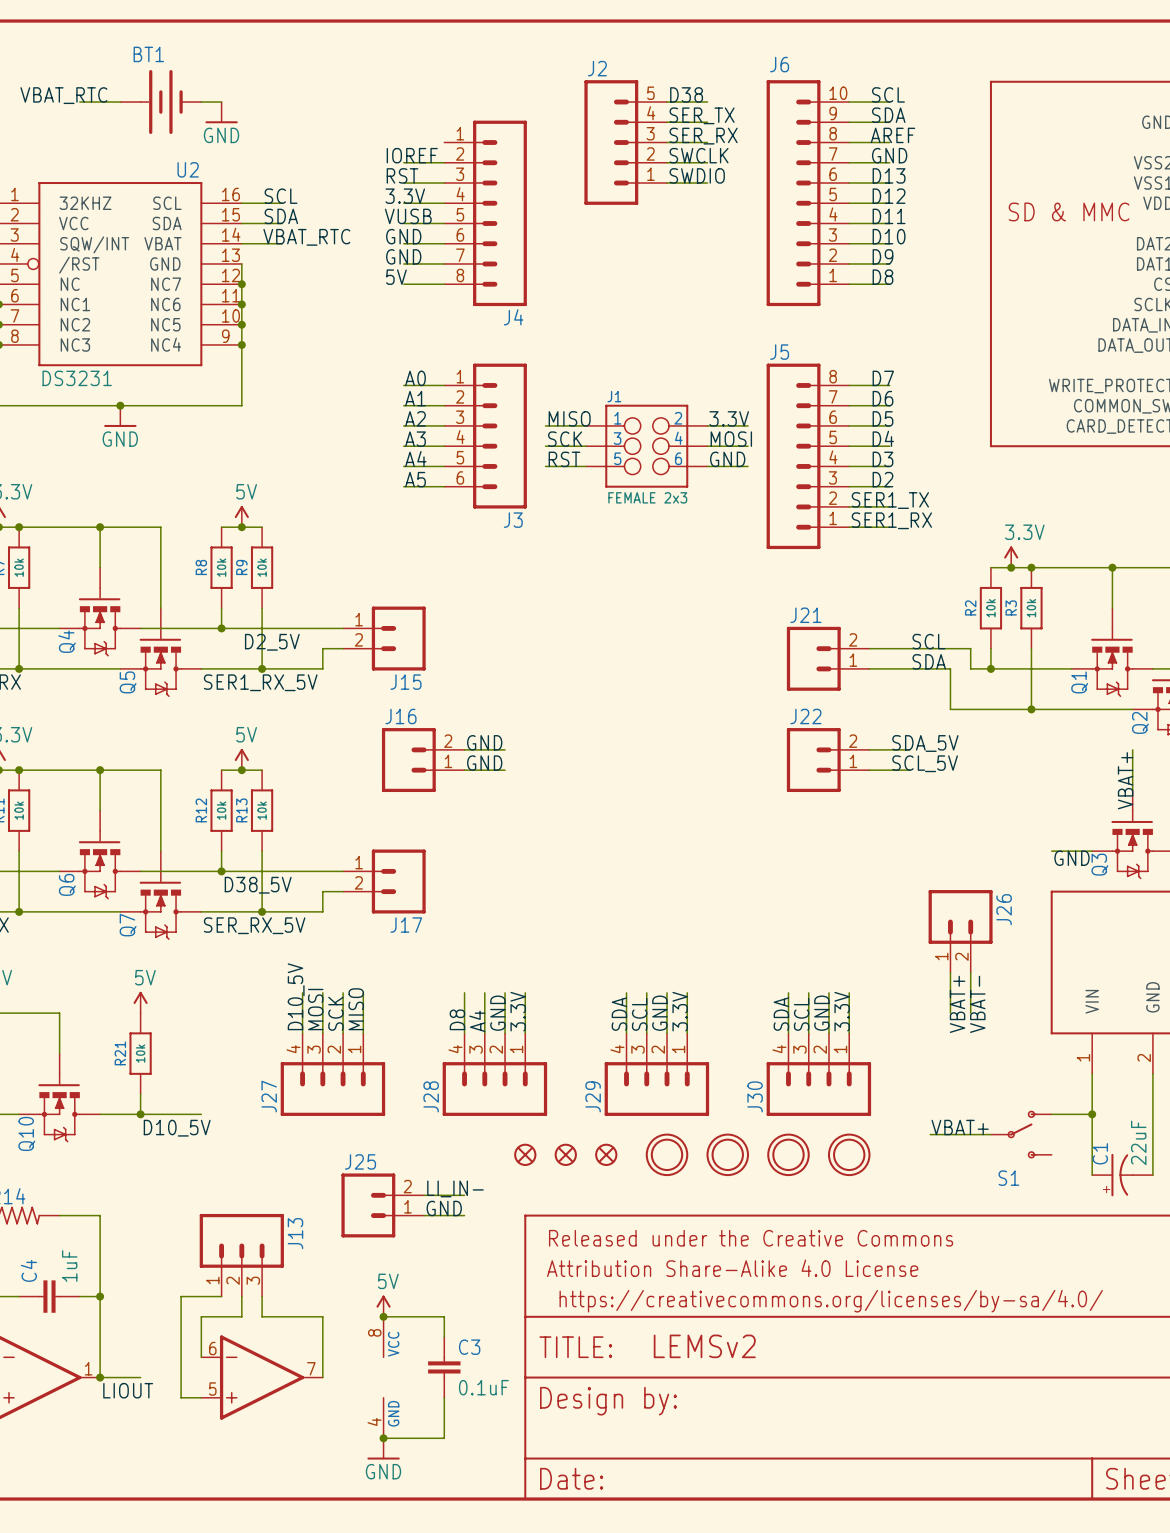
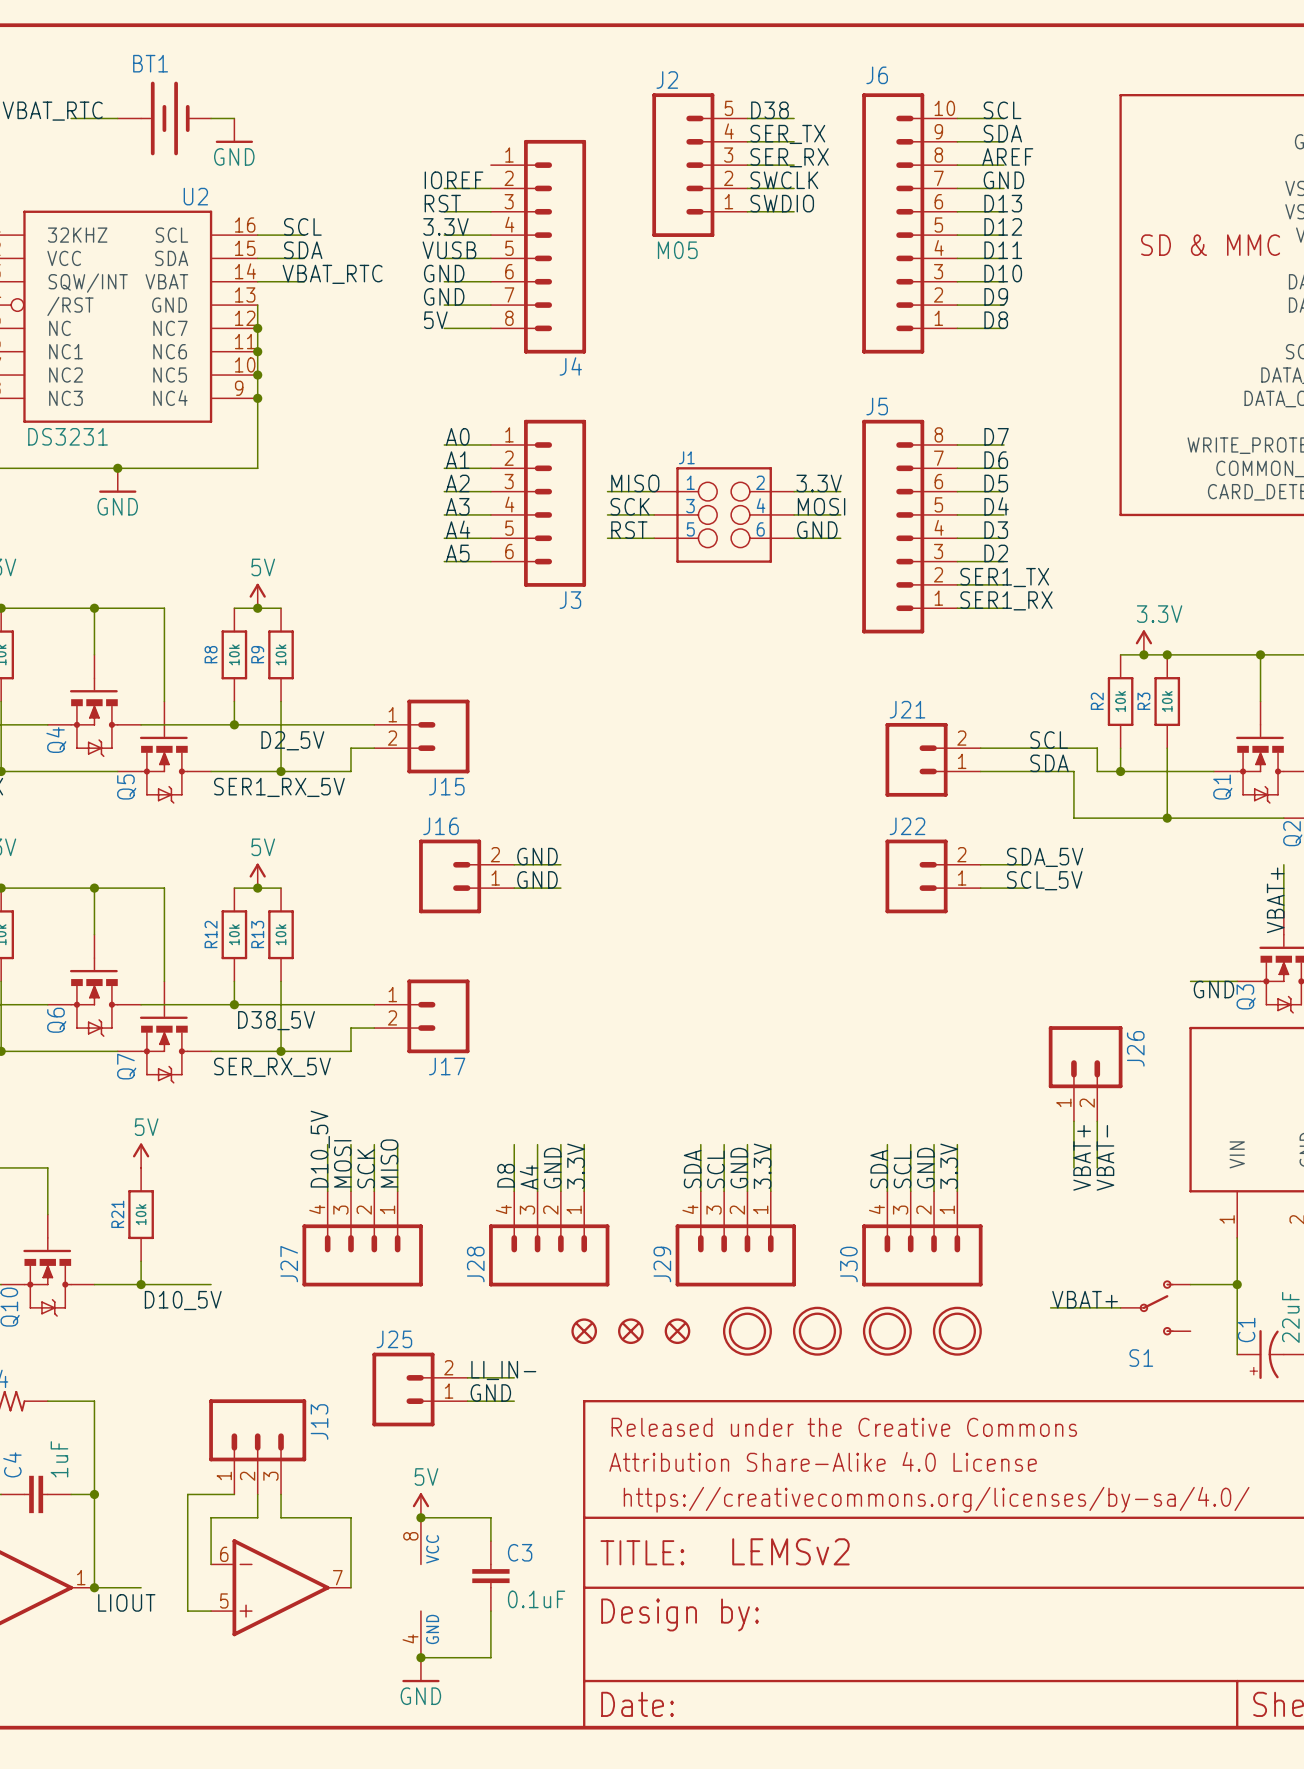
J2 value: none -> M05 (677, 250)
J1 value: FEMALE 2x3 (647, 497) -> none

